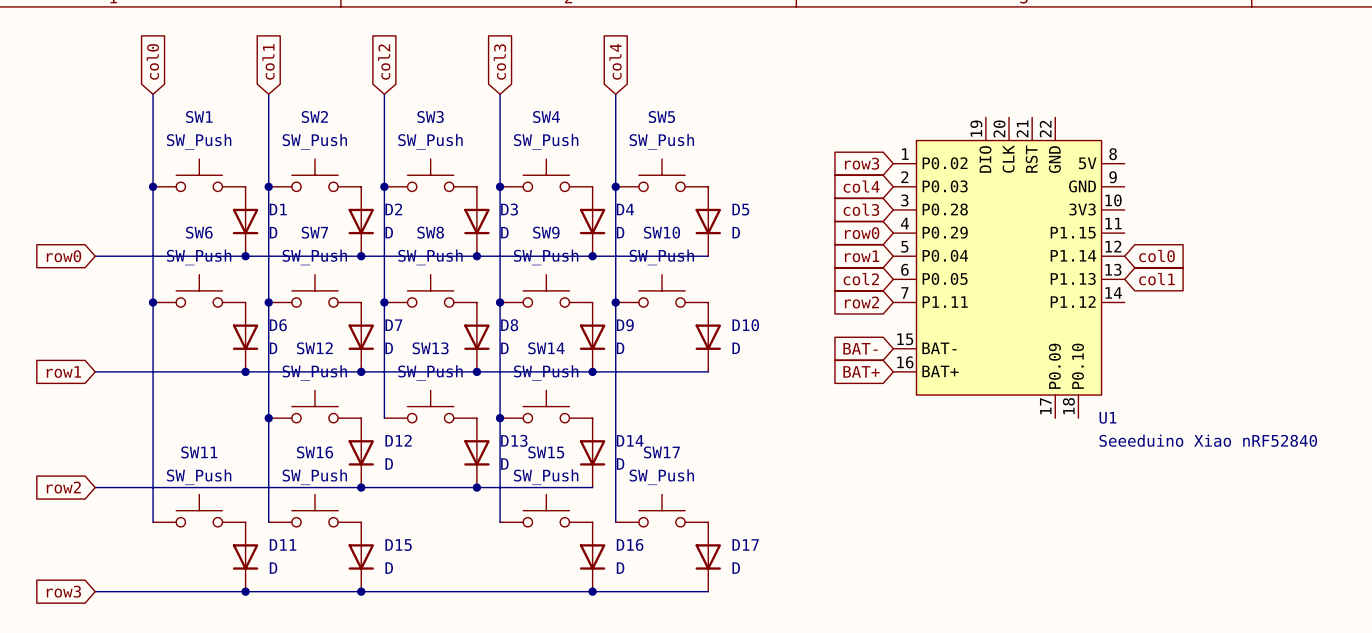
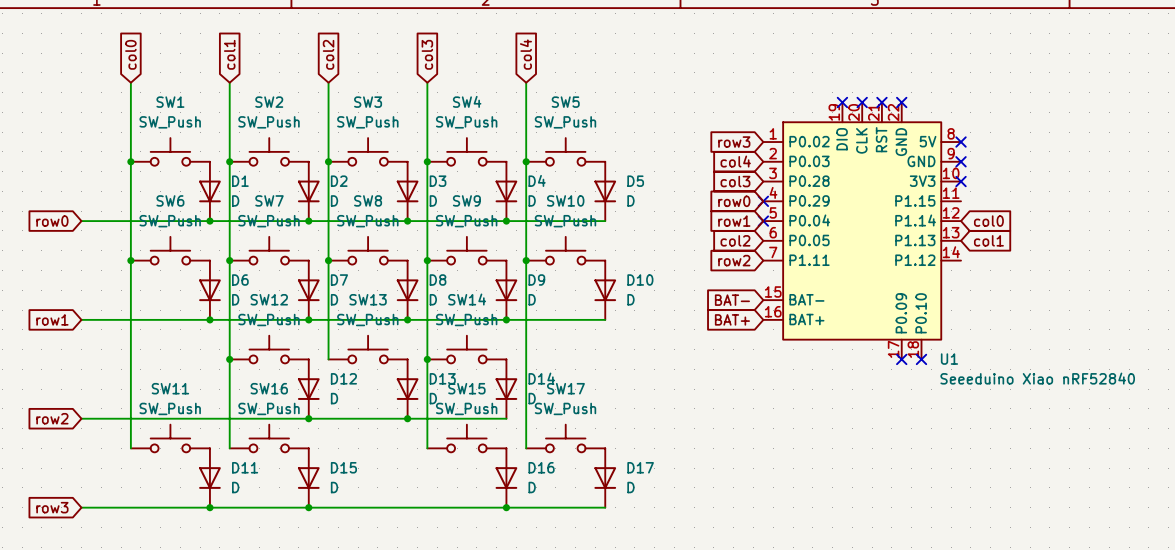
no-connect mark: none -> (842, 102)
no-connect mark: none -> (862, 102)
no-connect mark: none -> (881, 102)
no-connect mark: none -> (901, 102)
no-connect mark: none -> (961, 142)
no-connect mark: none -> (961, 161)
no-connect mark: none -> (961, 181)
no-connect mark: none -> (763, 201)
no-connect mark: none -> (763, 221)
no-connect mark: none -> (901, 359)
no-connect mark: none -> (921, 359)

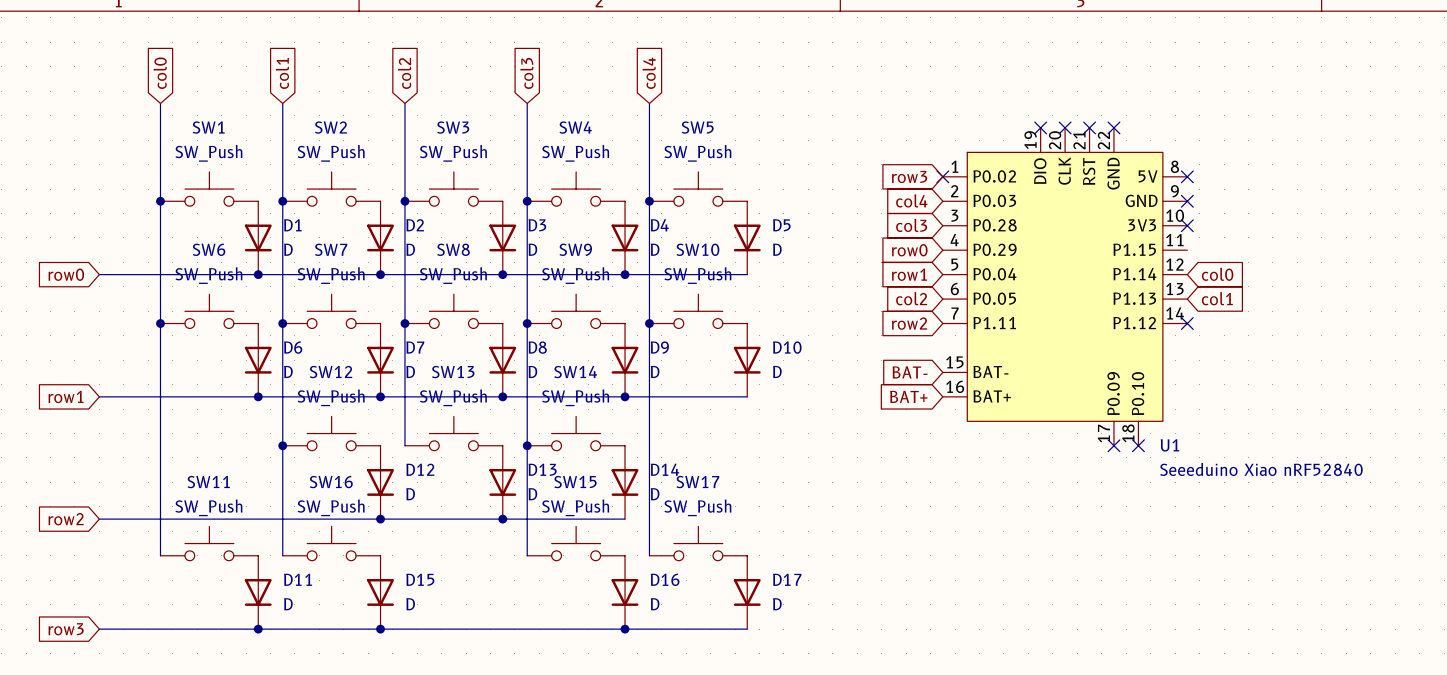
no-connect mark: none -> (942, 176)
no-connect mark: (763, 201) -> none
no-connect mark: (763, 221) -> none
no-connect mark: none -> (1187, 323)

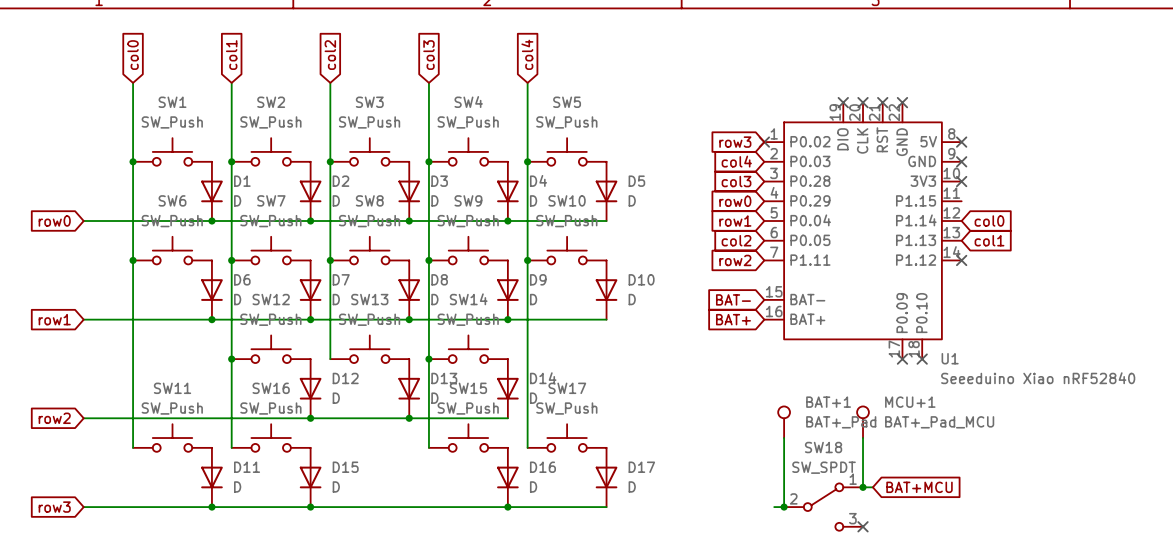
BAT+1: none -> BAT+_Pad (784, 422)
MCU+1: none -> BAT+_Pad_MCU (863, 422)
wire: none -> (784, 438) (784, 507) (774, 507)
wire: none -> (863, 438) (863, 487) (872, 487)
junction: none -> (863, 487)
global label: none -> BAT+MCU (919, 487)
junction: none -> (784, 507)
SW18: none -> SW_SPDT (823, 507)
no-connect mark: none -> (863, 526)

